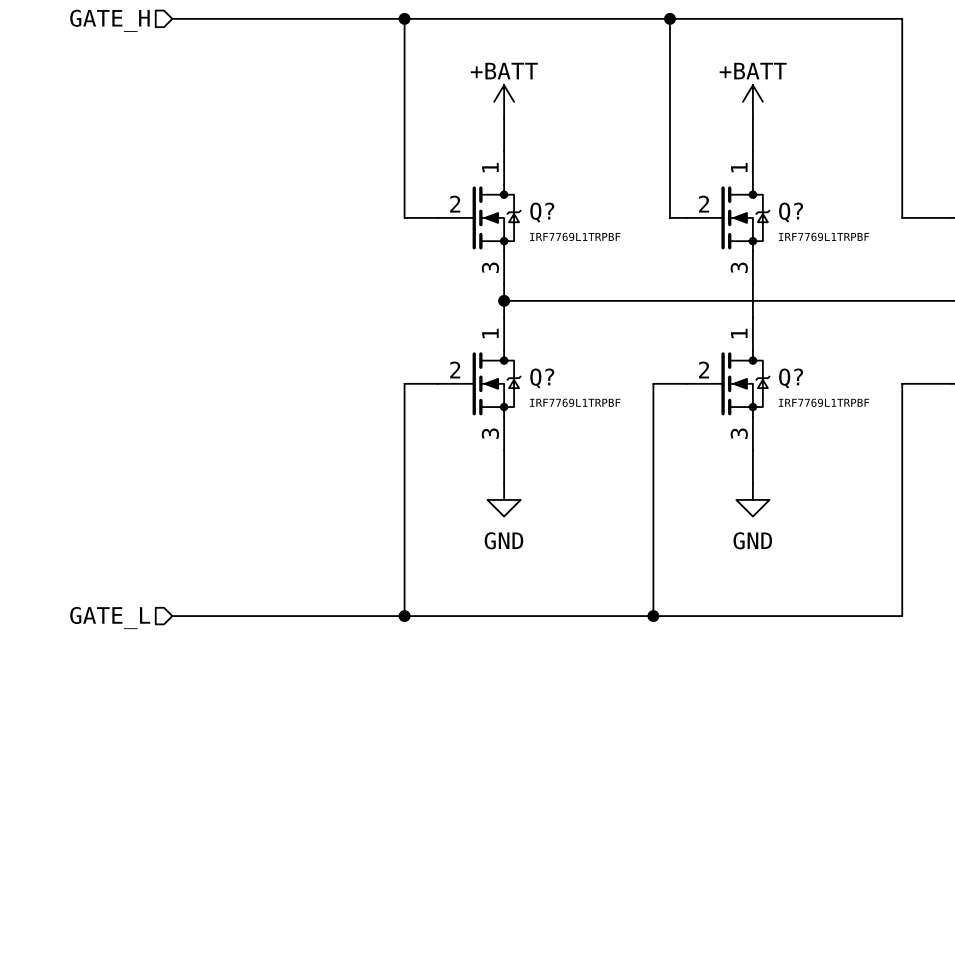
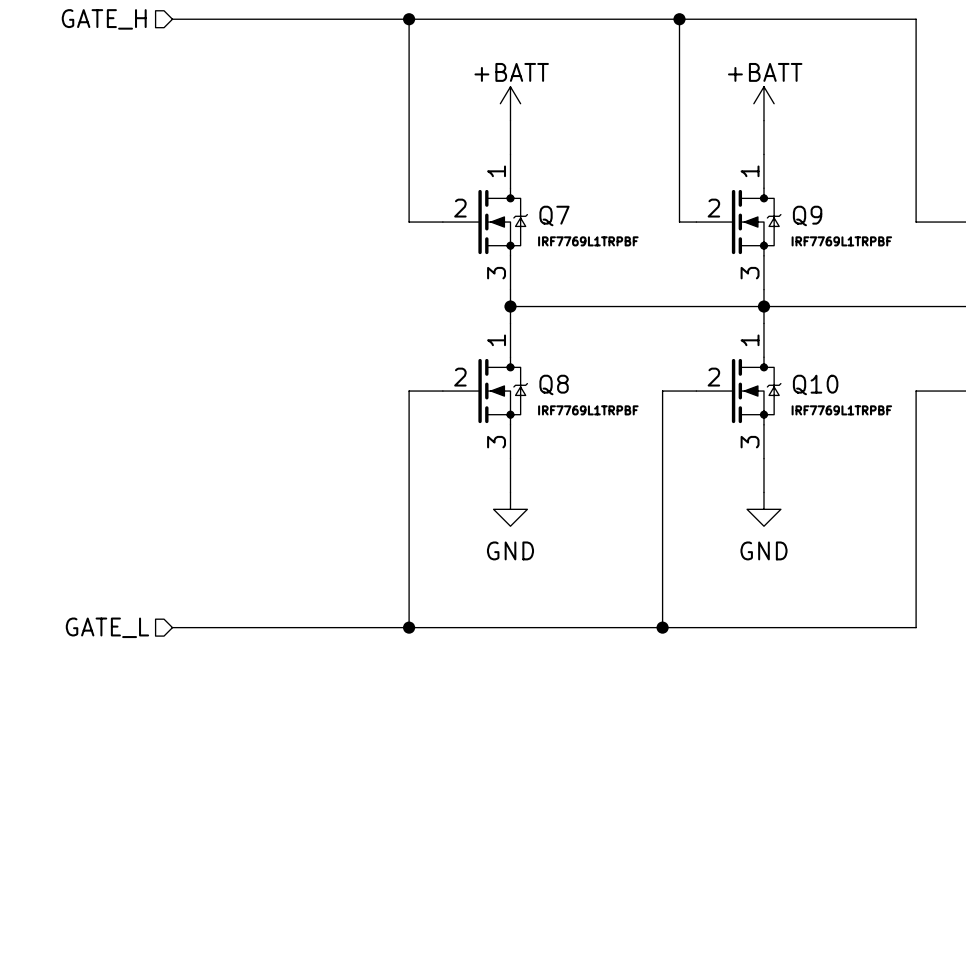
Q? name: Q? (542, 212) -> Q7 (554, 215)
Q? name: Q? (791, 212) -> Q9 (807, 215)
junction: none -> (763, 306)
Q? name: Q? (542, 378) -> Q8 (554, 384)
Q? name: Q? (791, 378) -> Q10 (815, 384)

